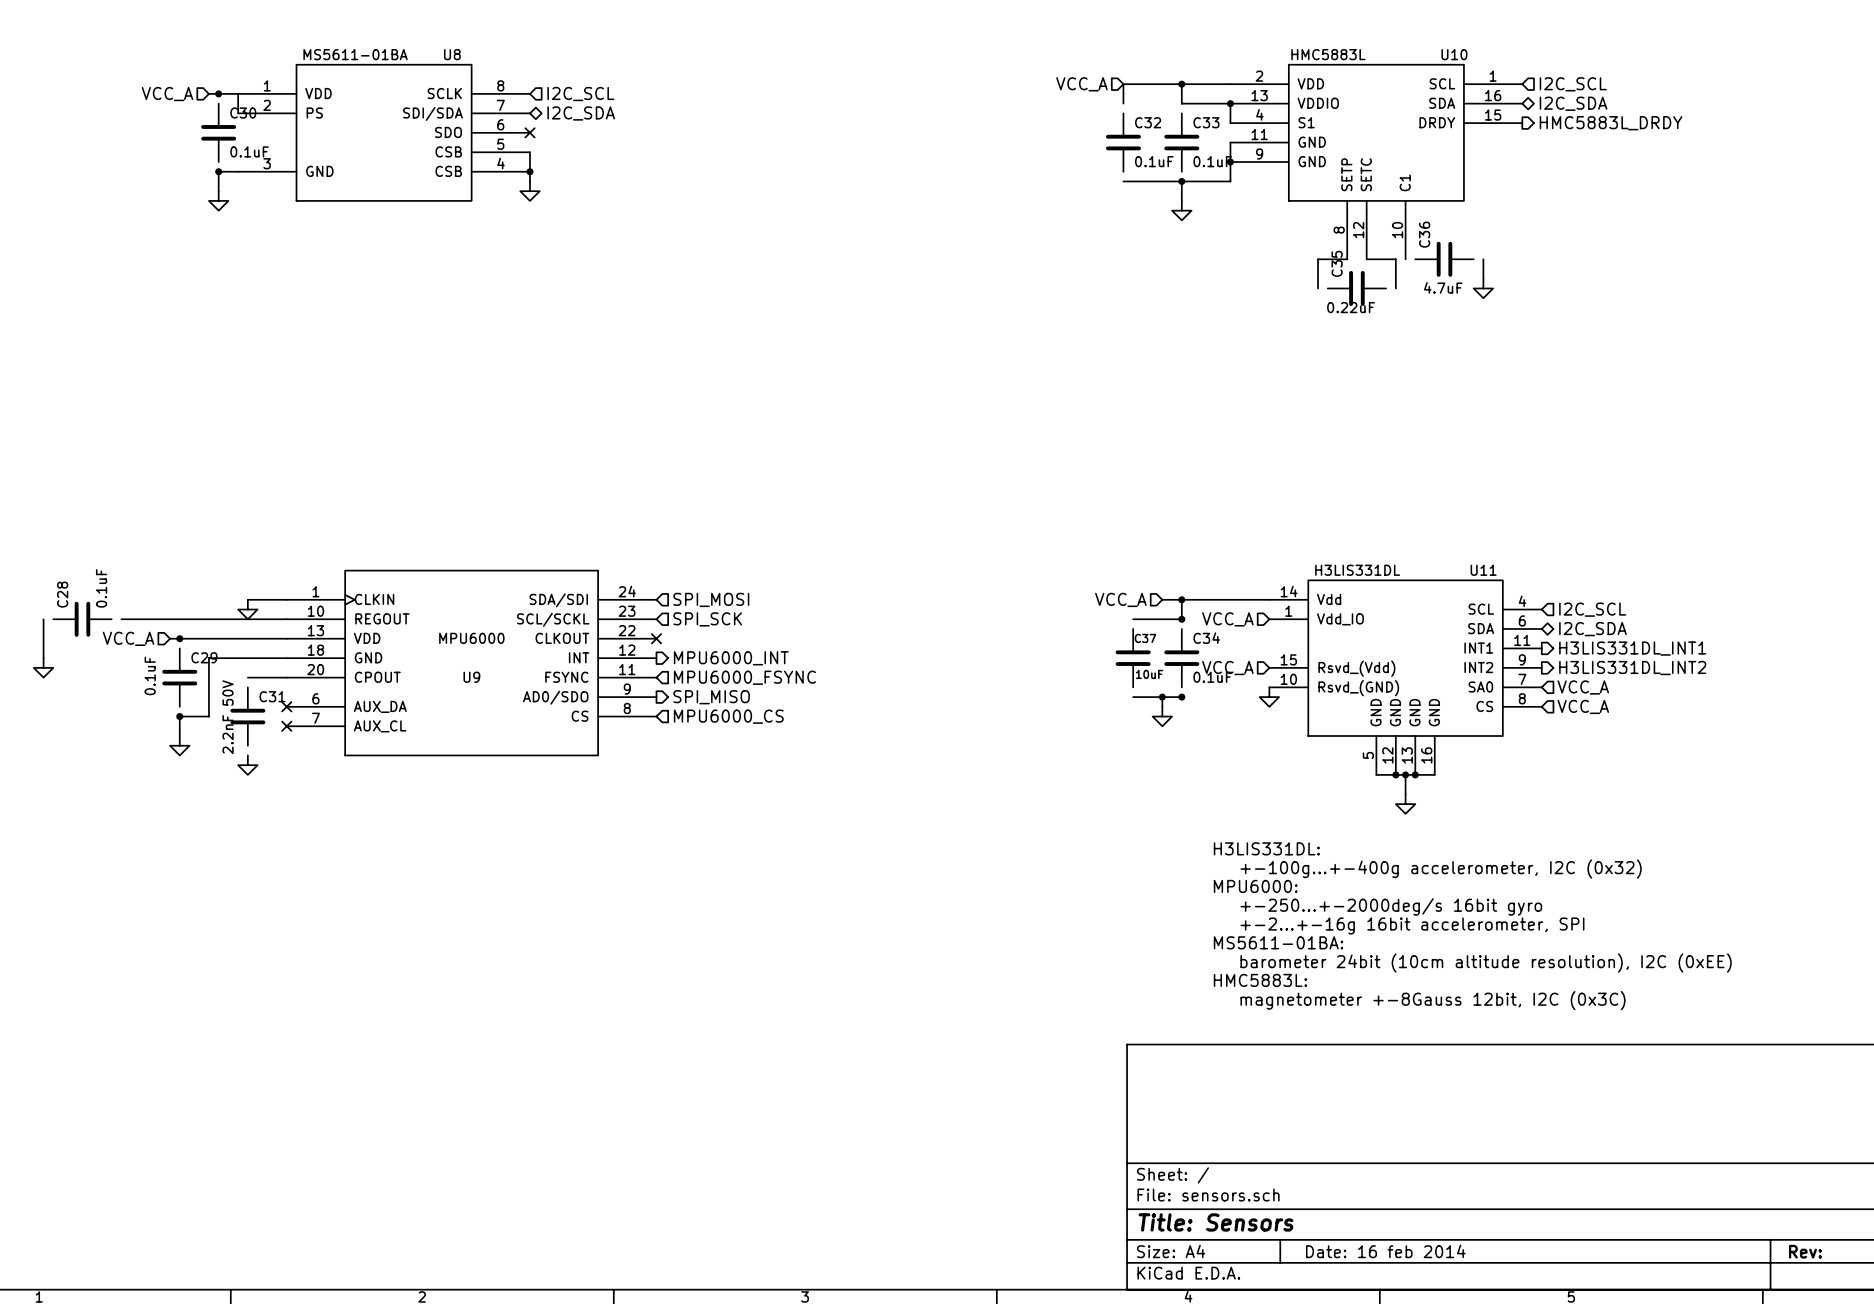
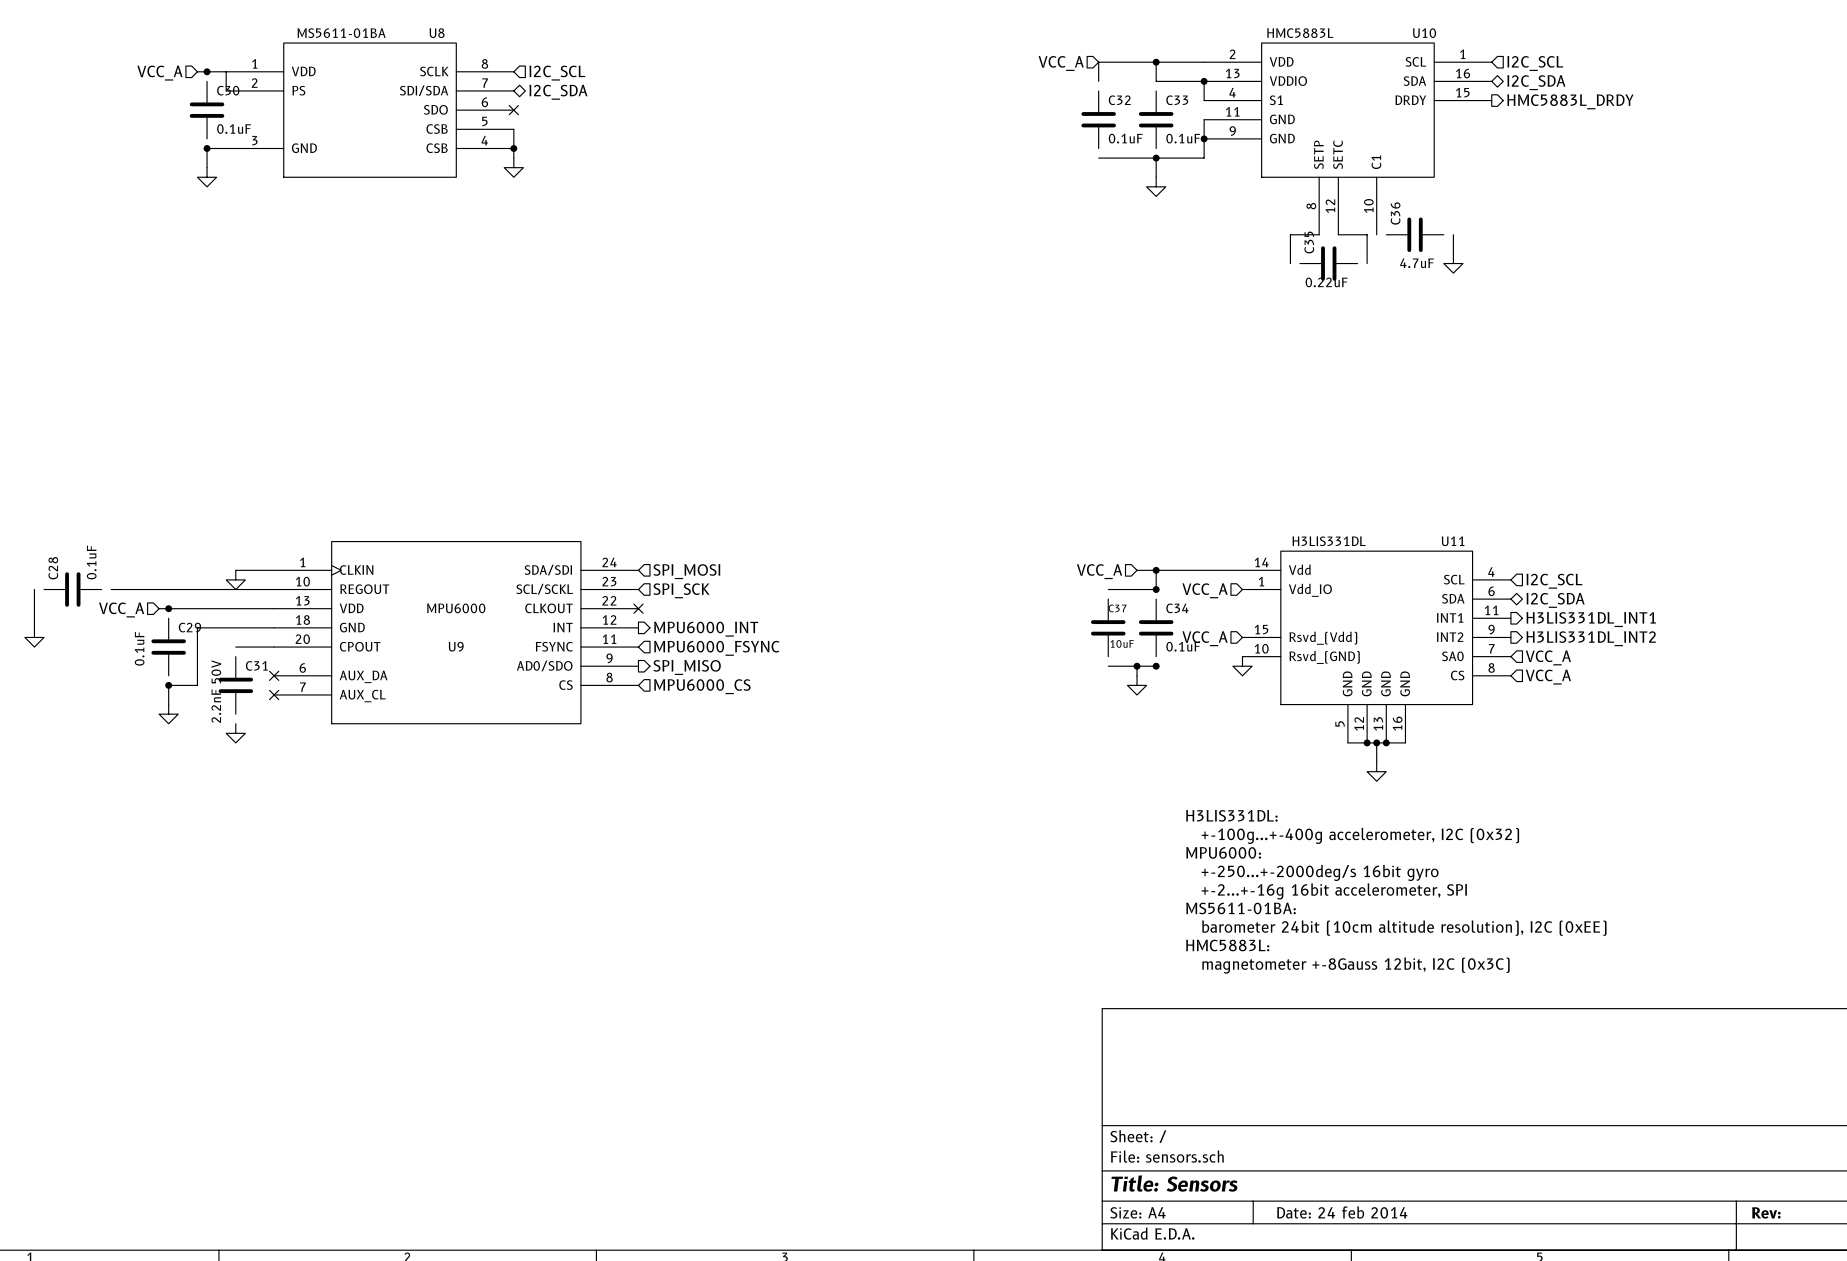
title block: Date: 16 feb 2014 (1385, 1251) -> Date: 24 feb 2014 (1342, 1212)

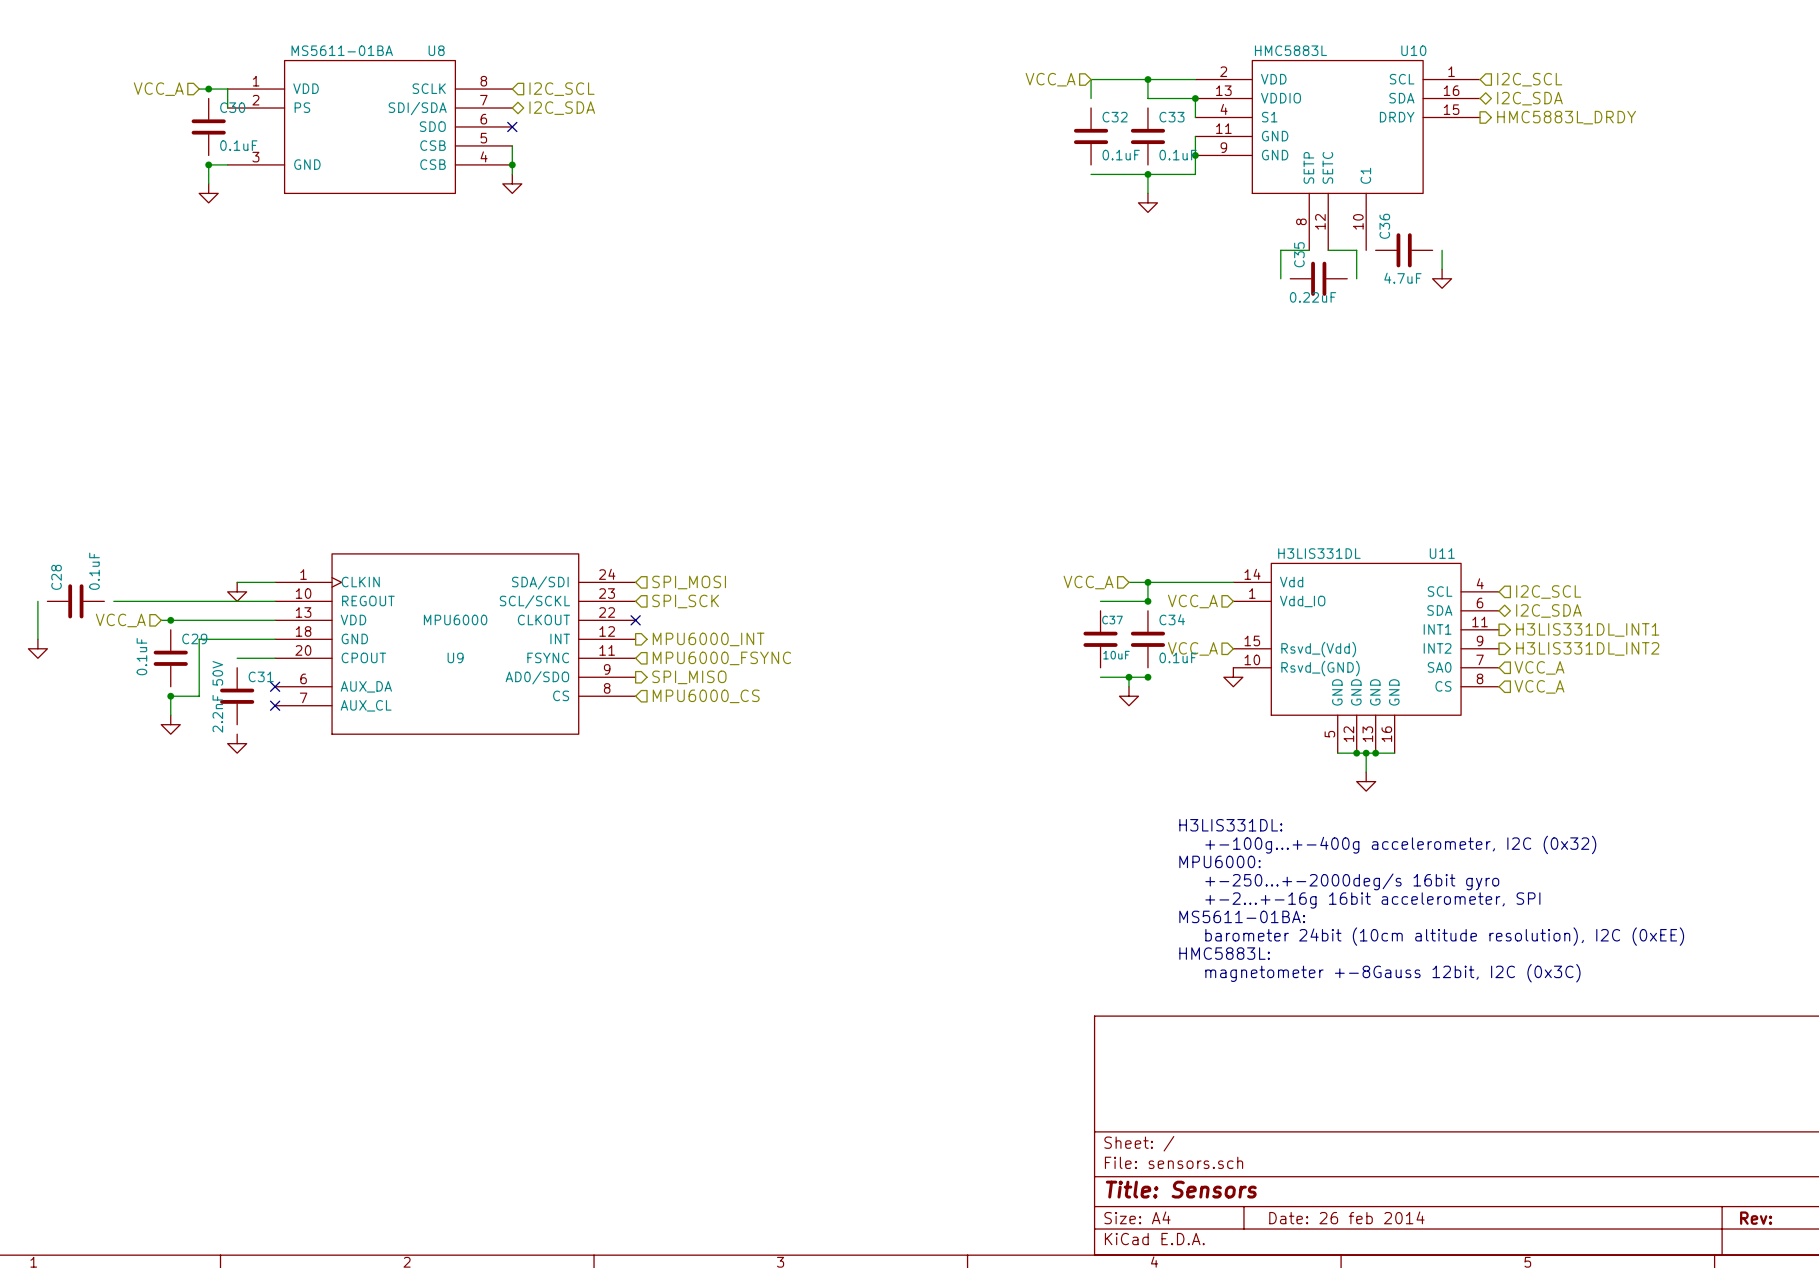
title block: Date: 24 feb 2014 (1342, 1212) -> Date: 26 feb 2014 (1346, 1217)

